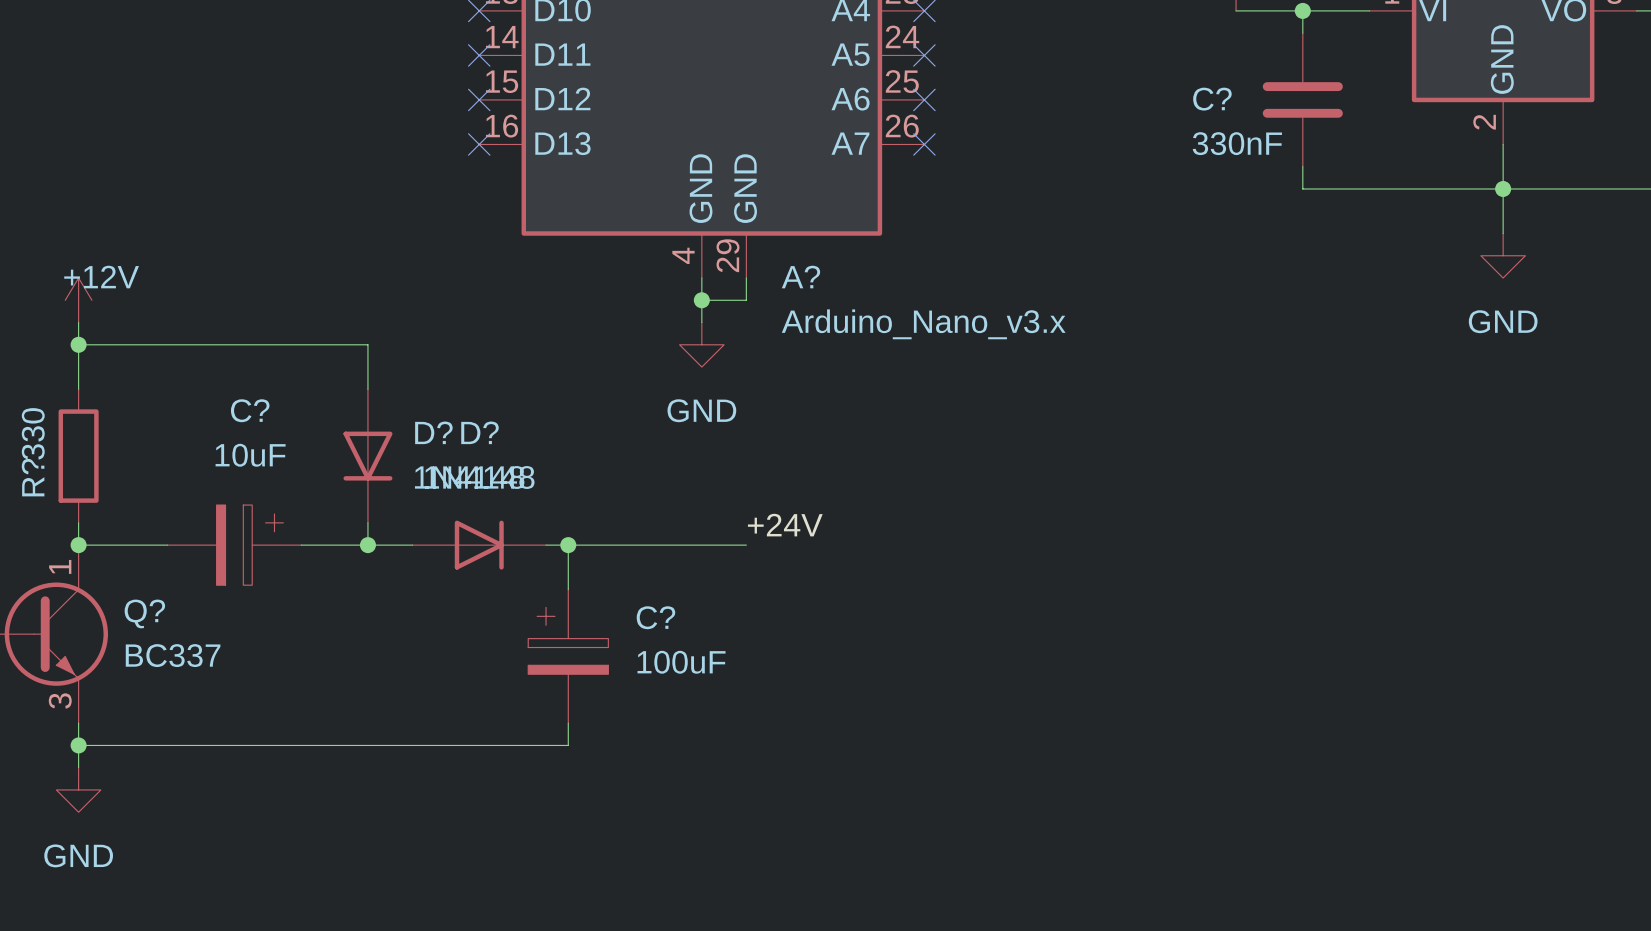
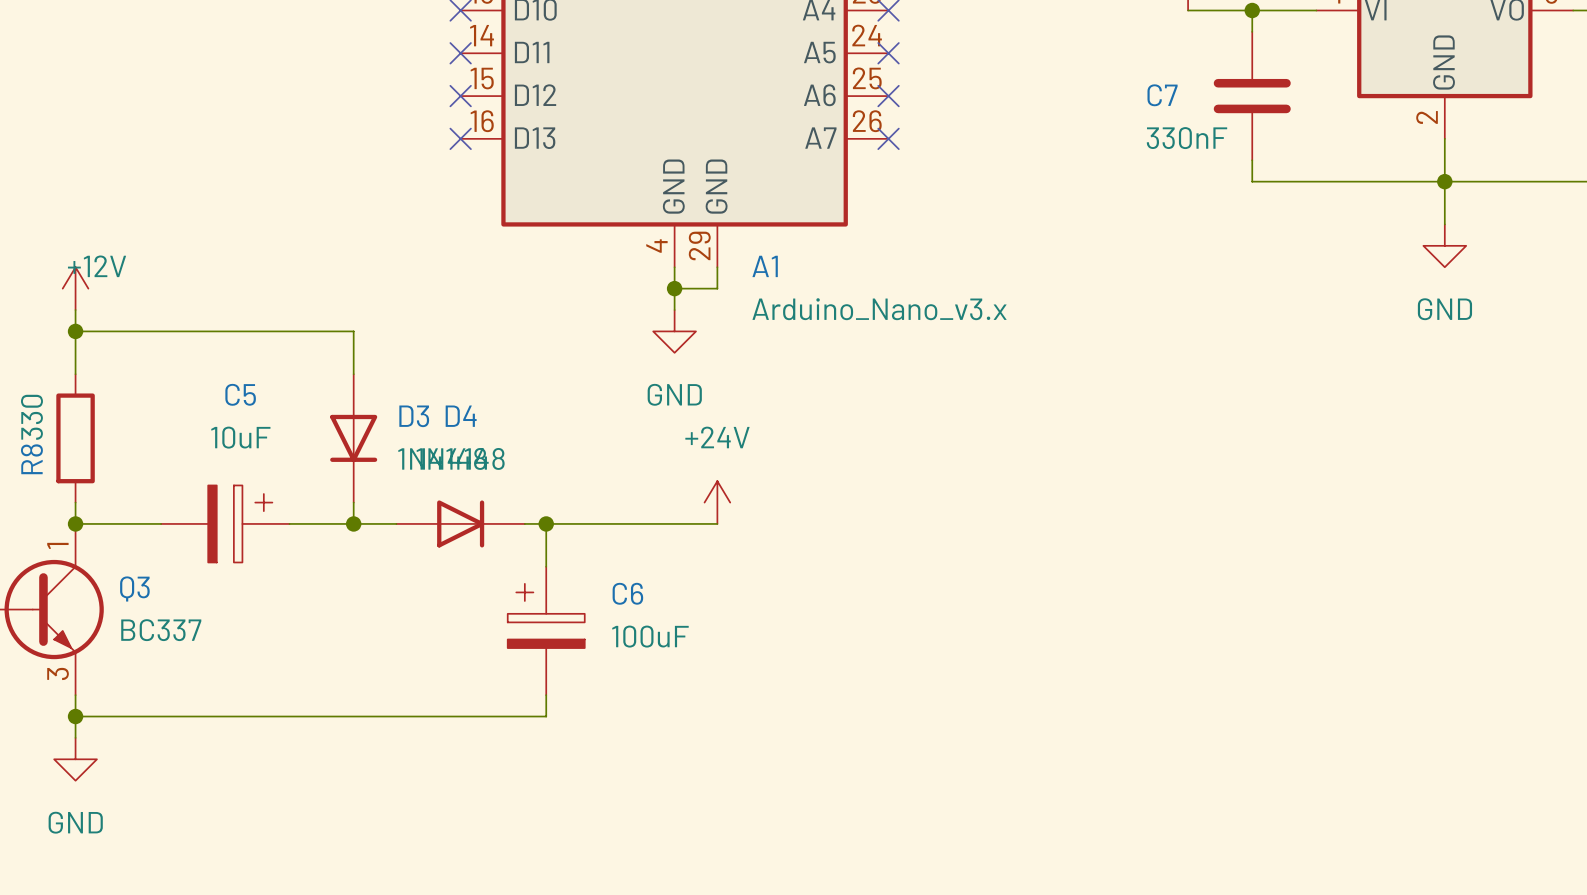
C? name: C? (1212, 99) -> C7 (1162, 95)
A? name: A? (800, 277) -> A1 (765, 266)
C? name: C? (250, 410) -> C5 (240, 394)
D? name: D? (433, 432) -> D3 (414, 416)
D? name: D? (479, 432) -> D4 (461, 416)
R? name: R? (33, 477) -> R8 (31, 459)
power symbol: none -> +24V (717, 502)
label: +24V (785, 525) -> none
Q? name: Q? (144, 613) -> Q3 (134, 588)
C? name: C? (655, 617) -> C6 (627, 593)

